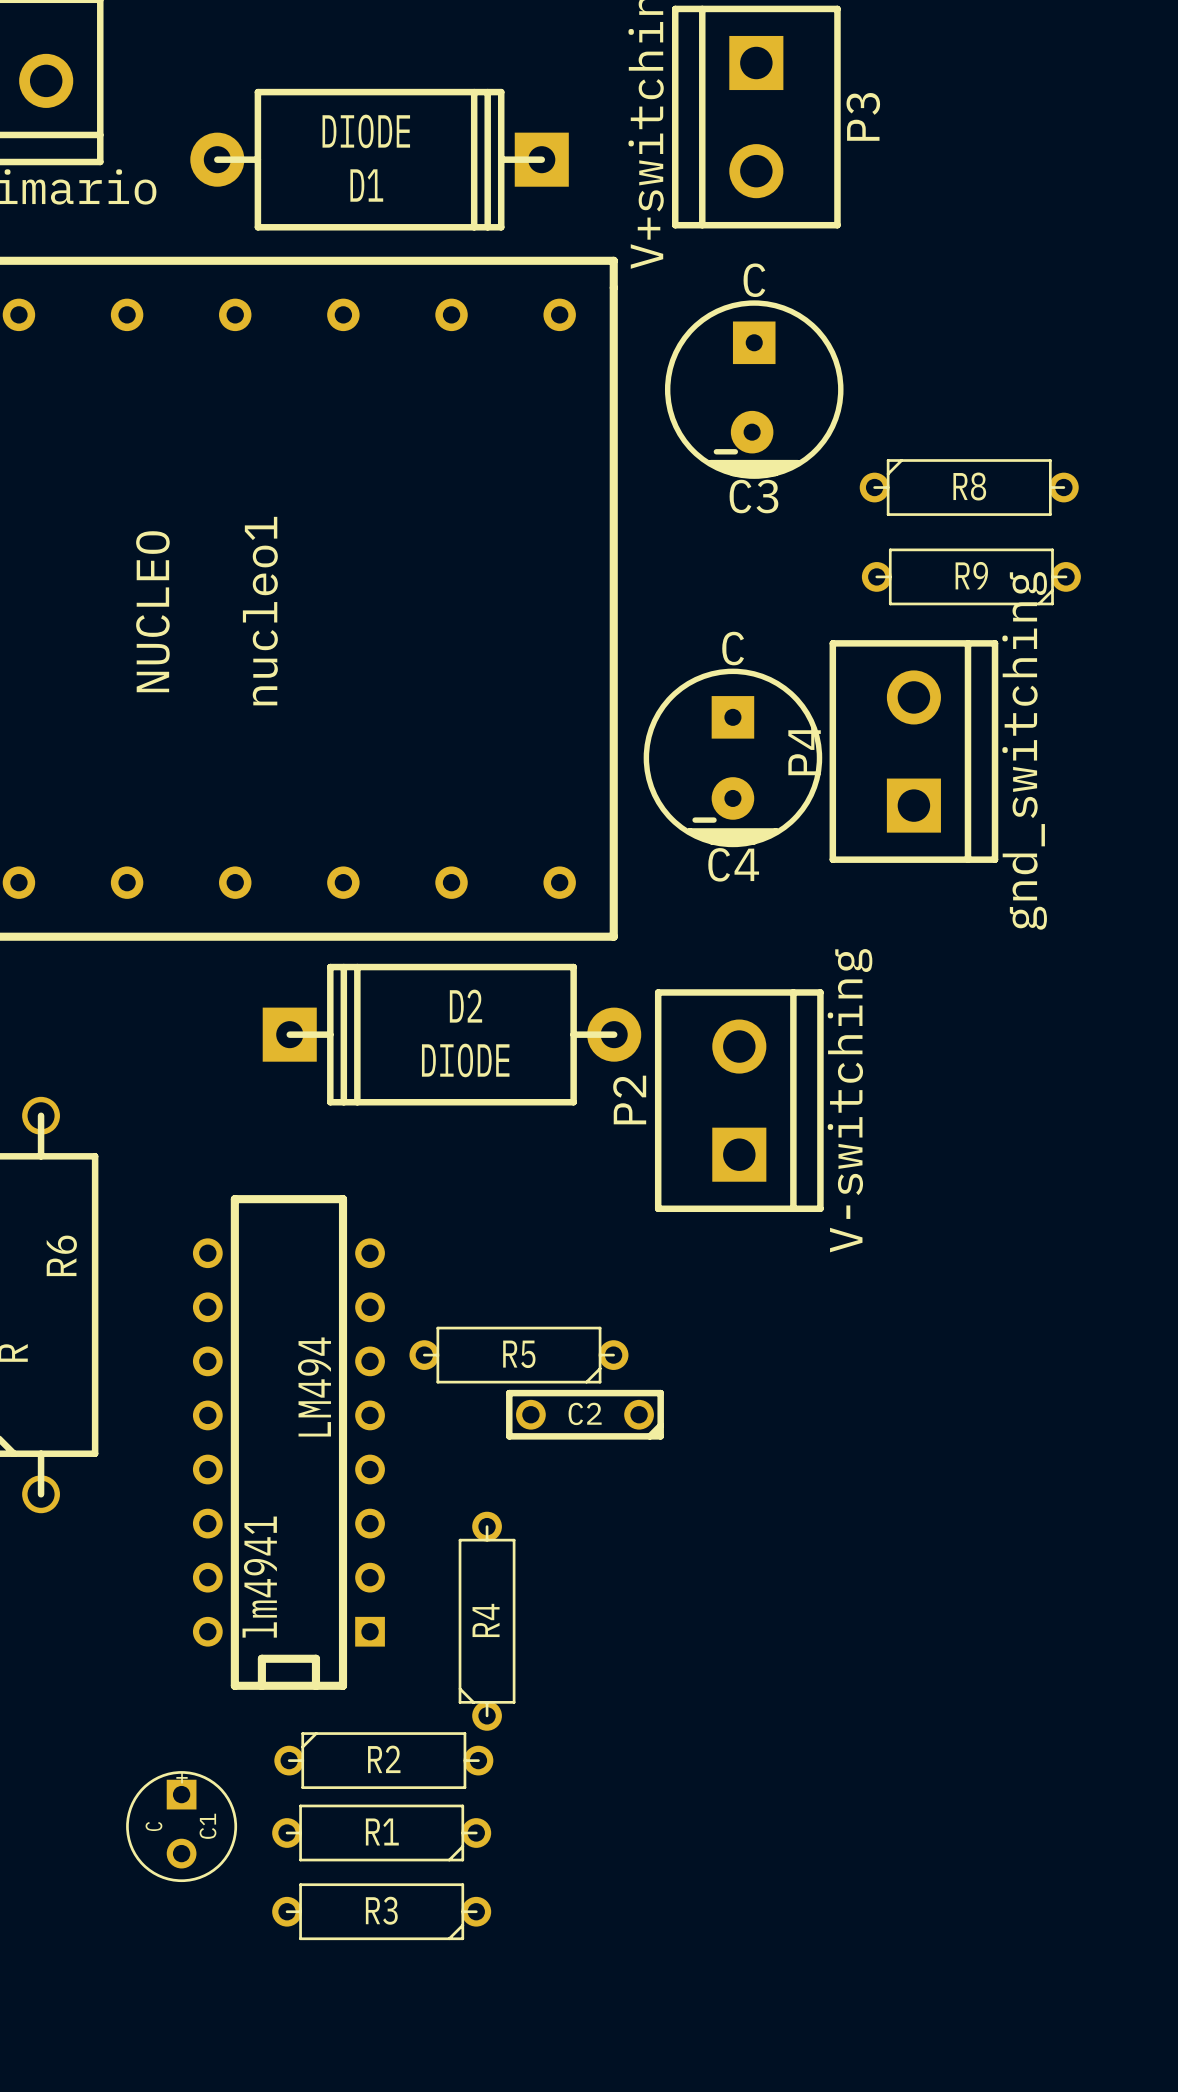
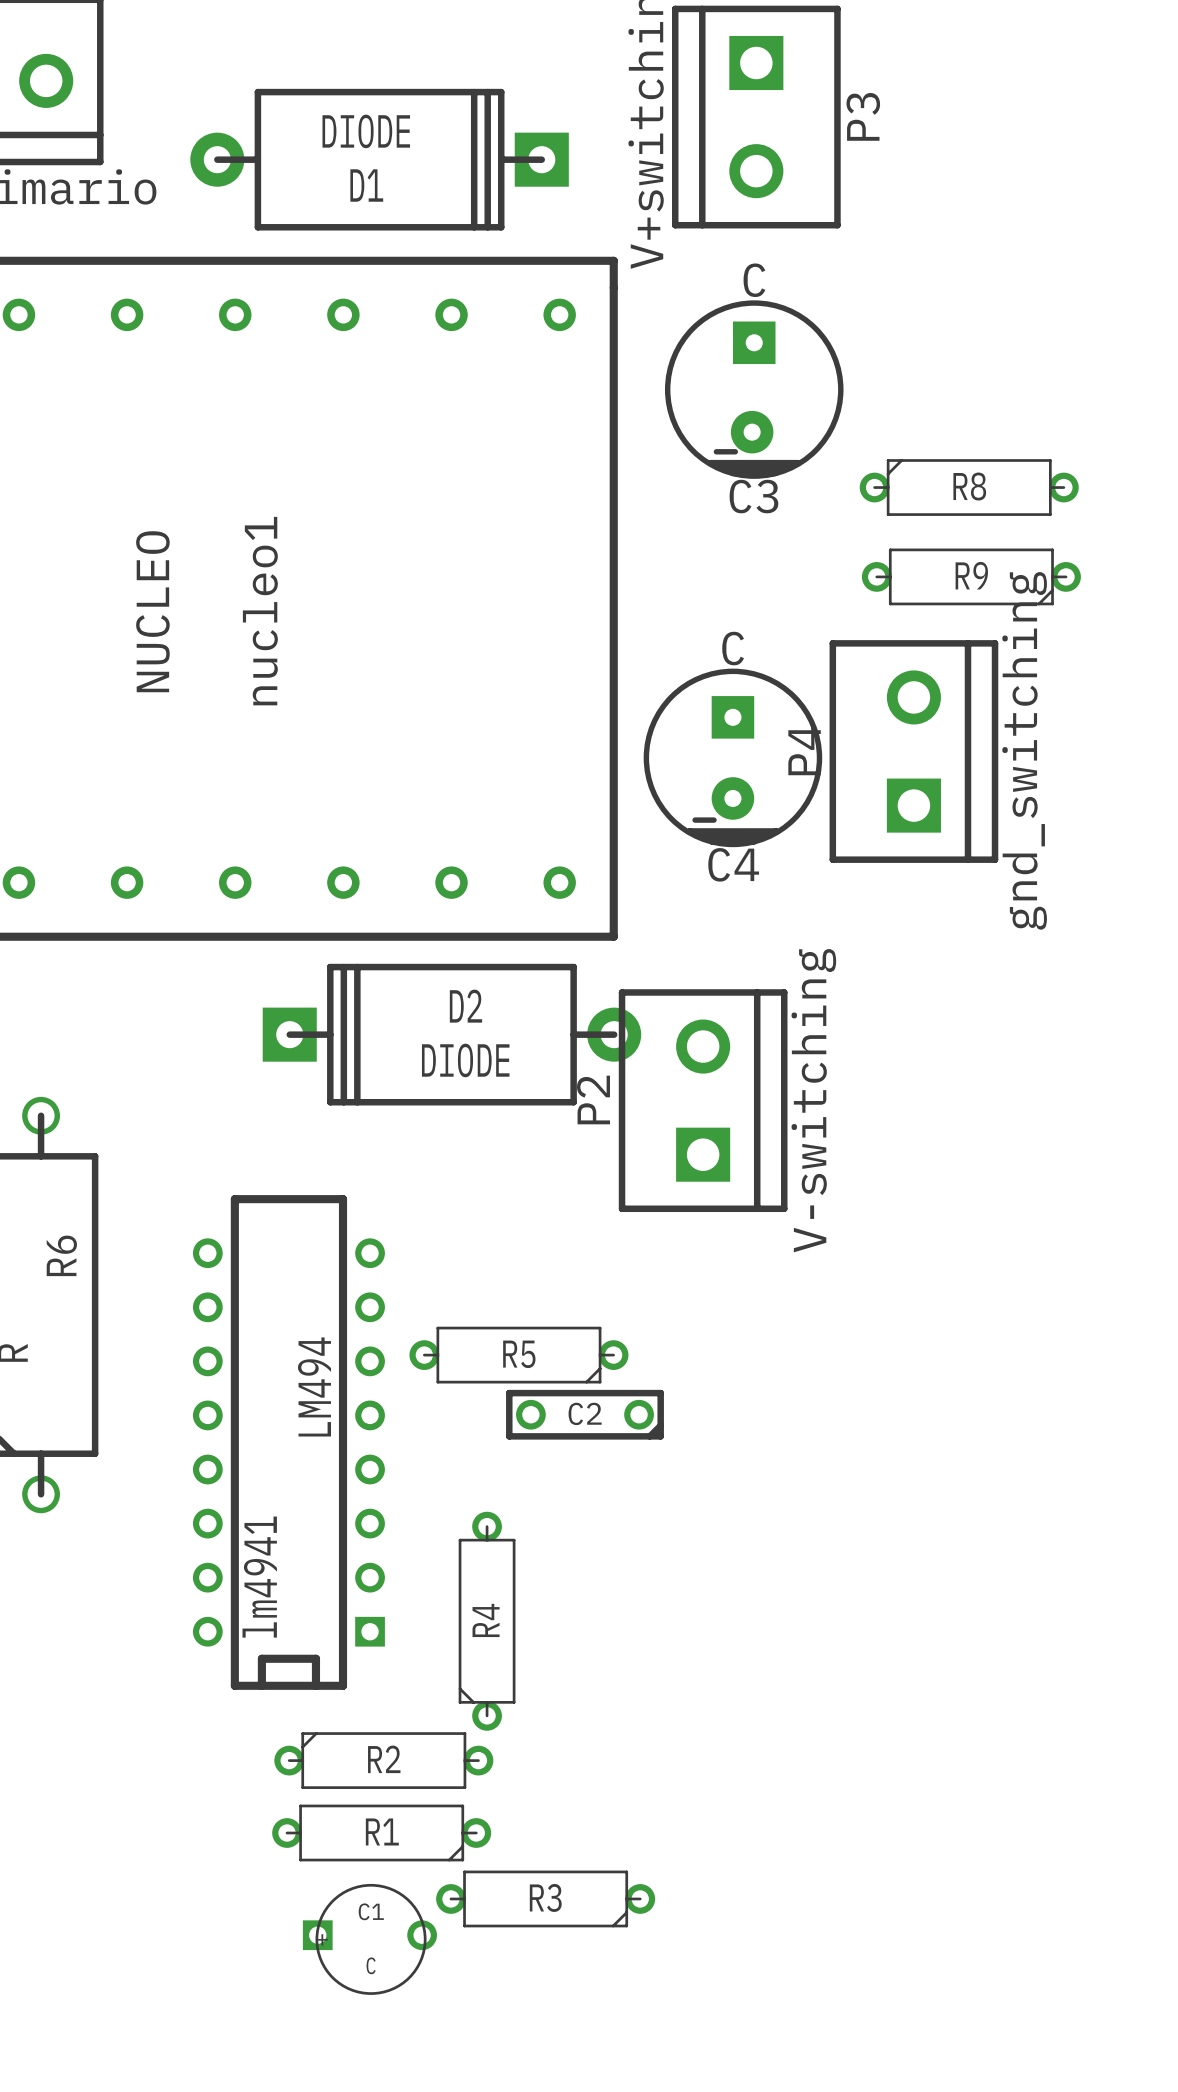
P2 position: (739, 1100) -> (703, 1100)
C1 footprint: [126, 1771, 238, 1883] -> [302, 1883, 437, 1995]
R3 position: (381, 1911) -> (545, 1898)

